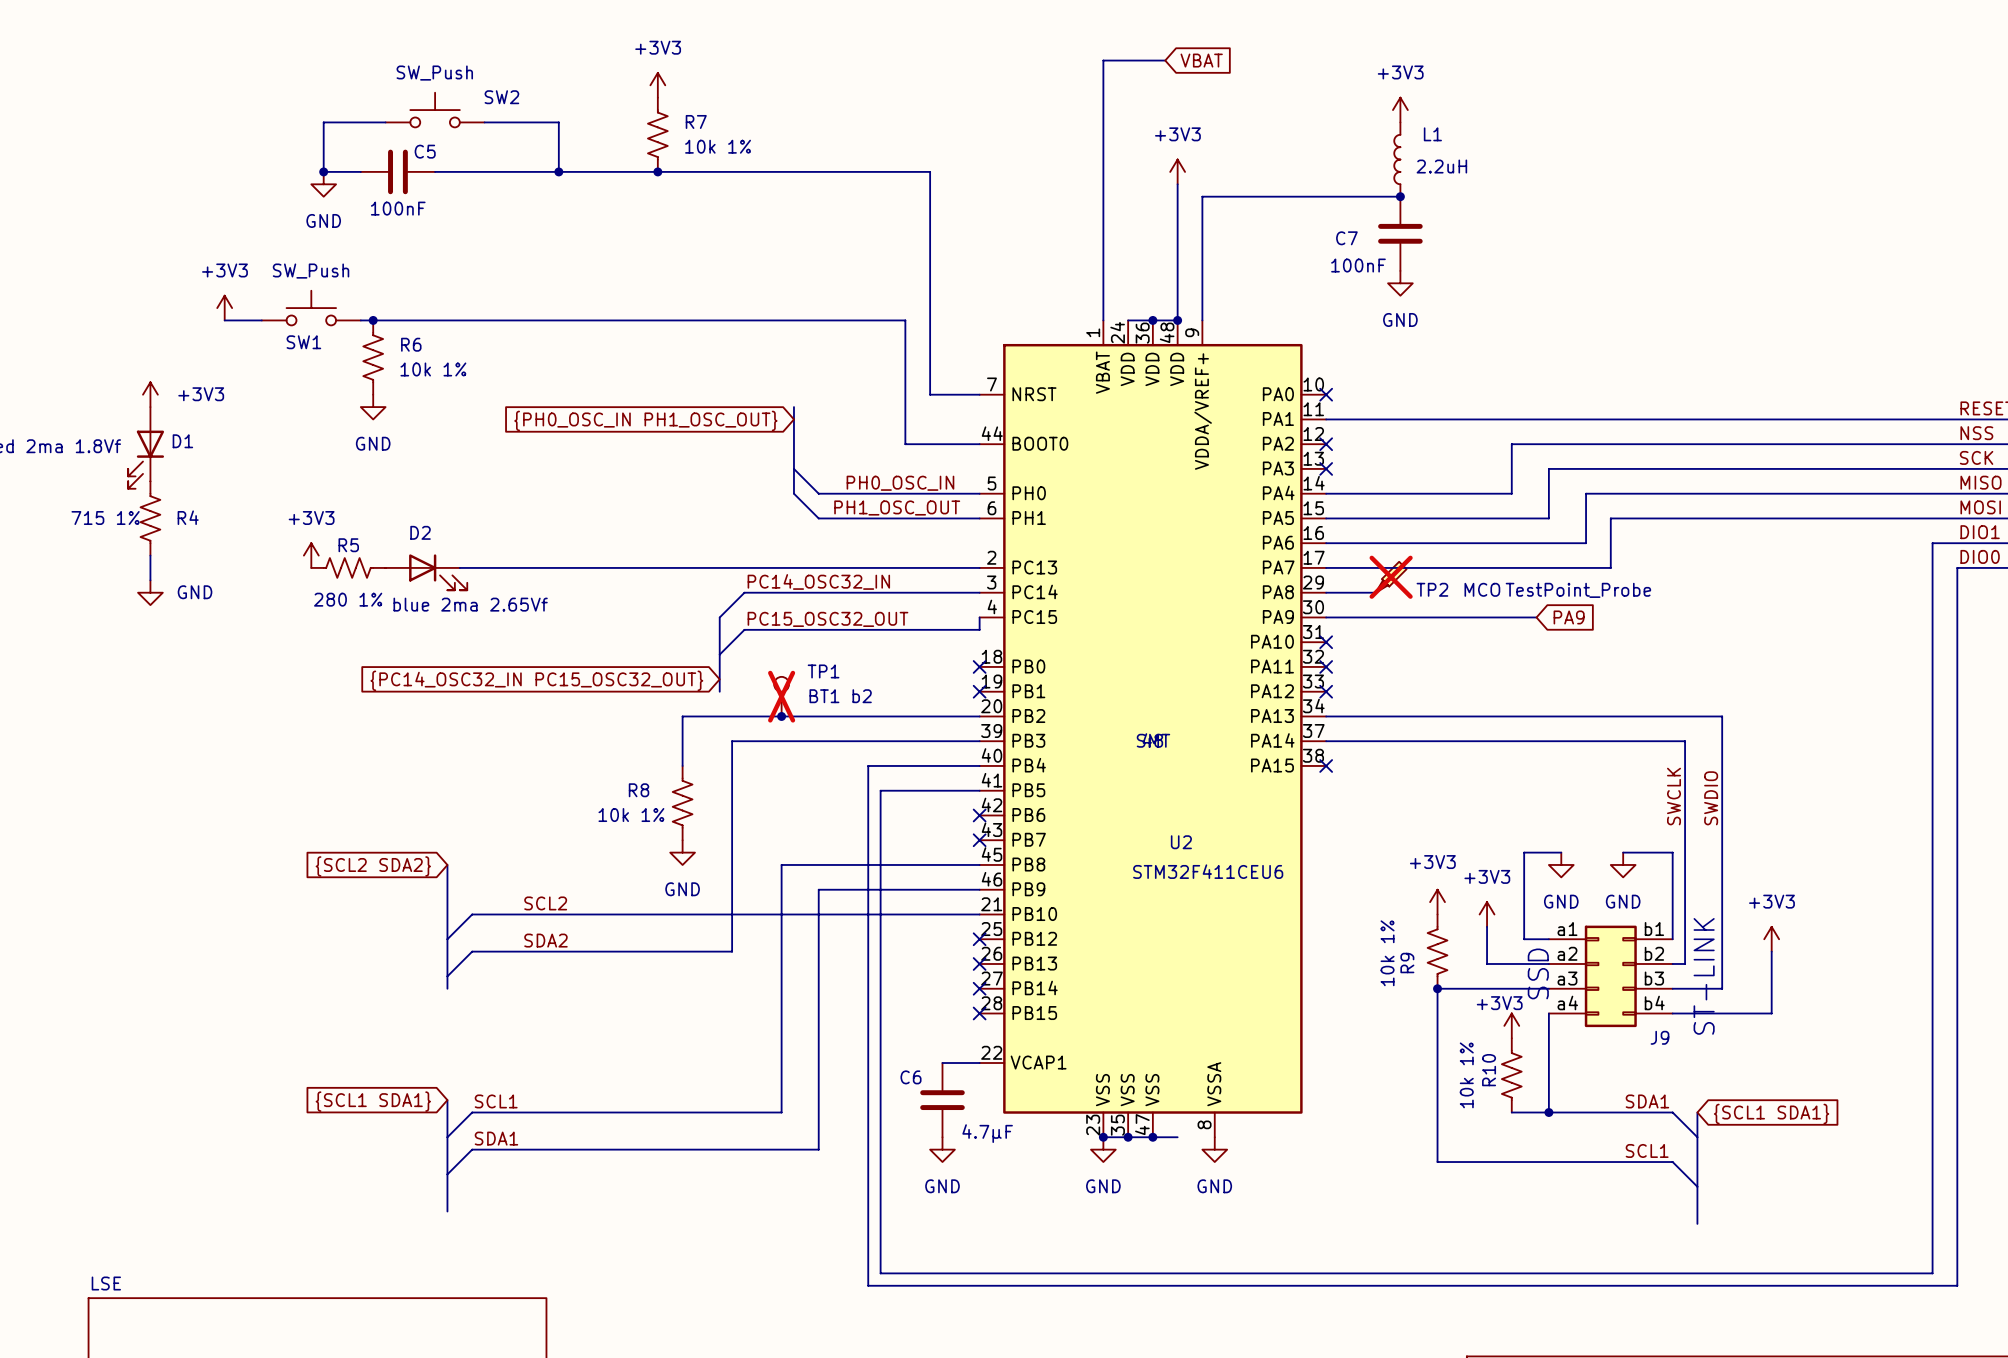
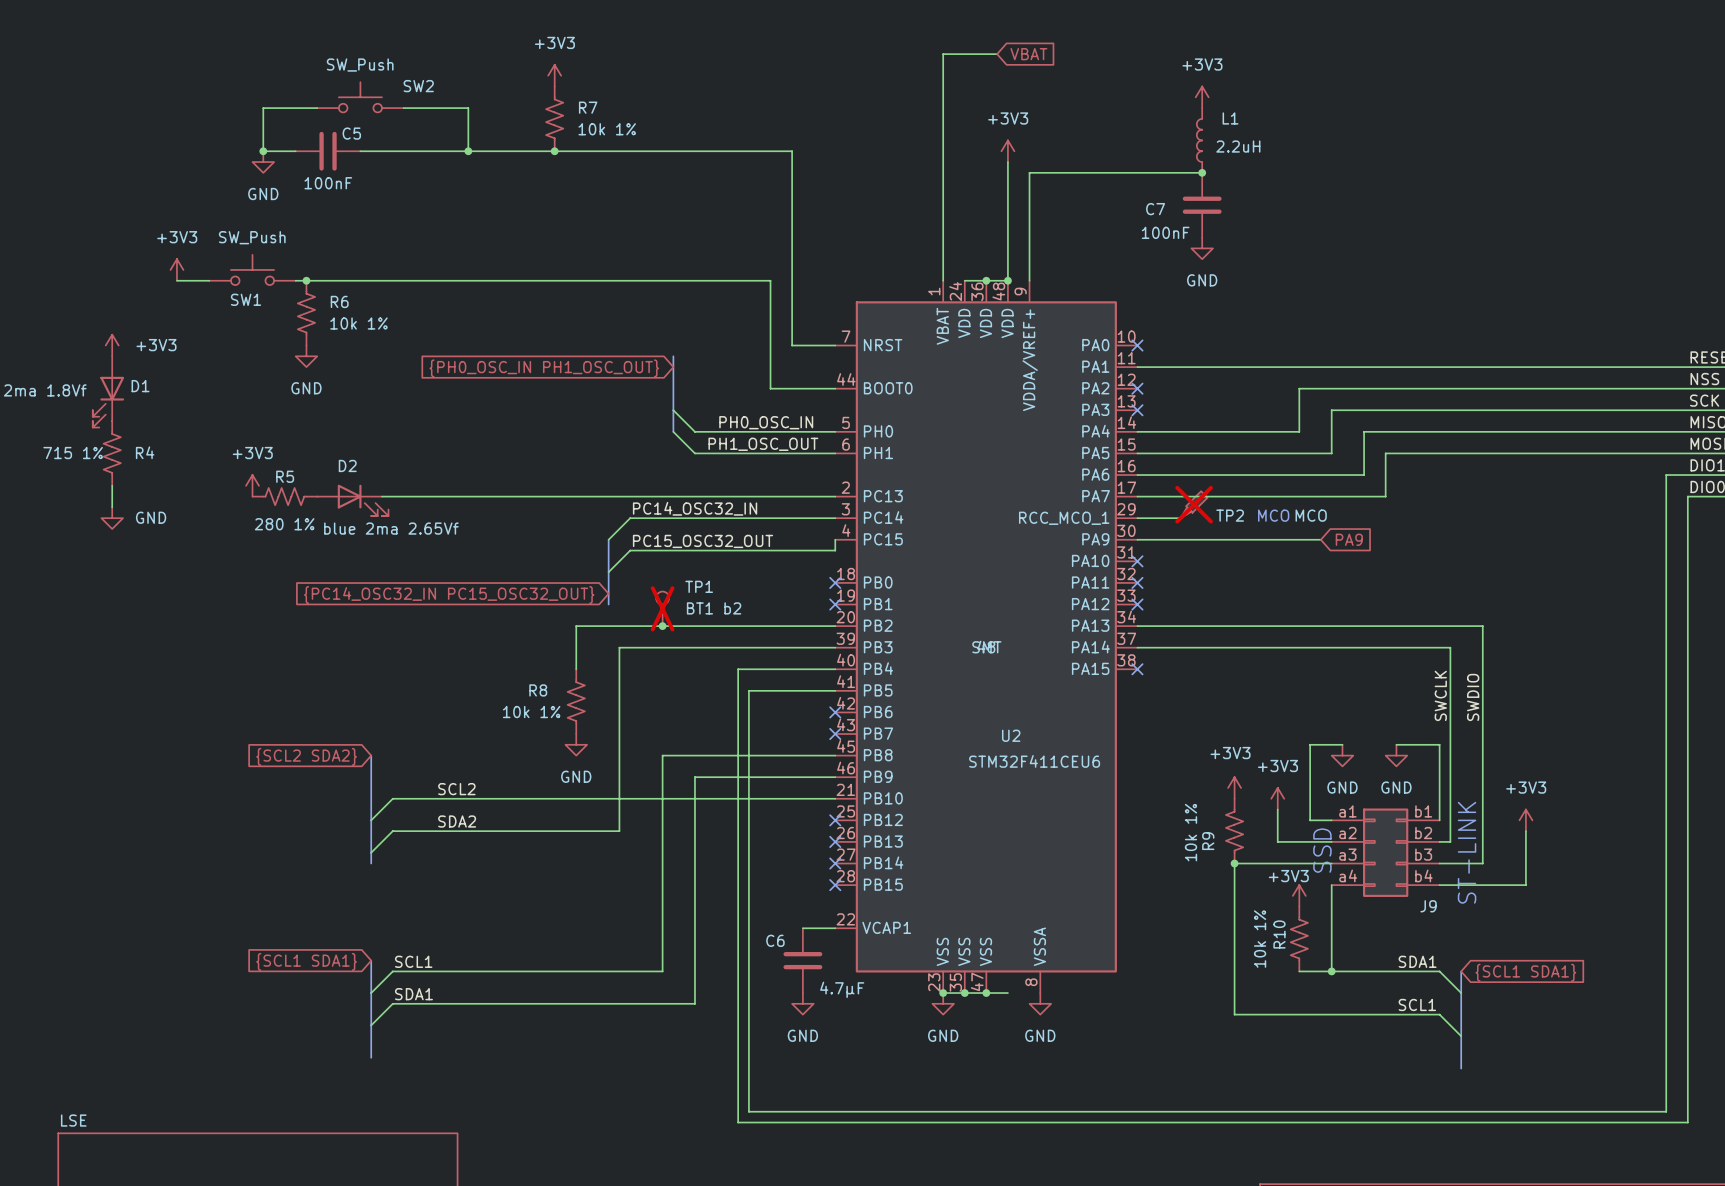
TP2 value: TestPoint_Probe (1578, 590) -> MCO (1311, 515)
U2 pin name: PA8 (1278, 592) -> RCC_MCO_1 (1064, 518)

